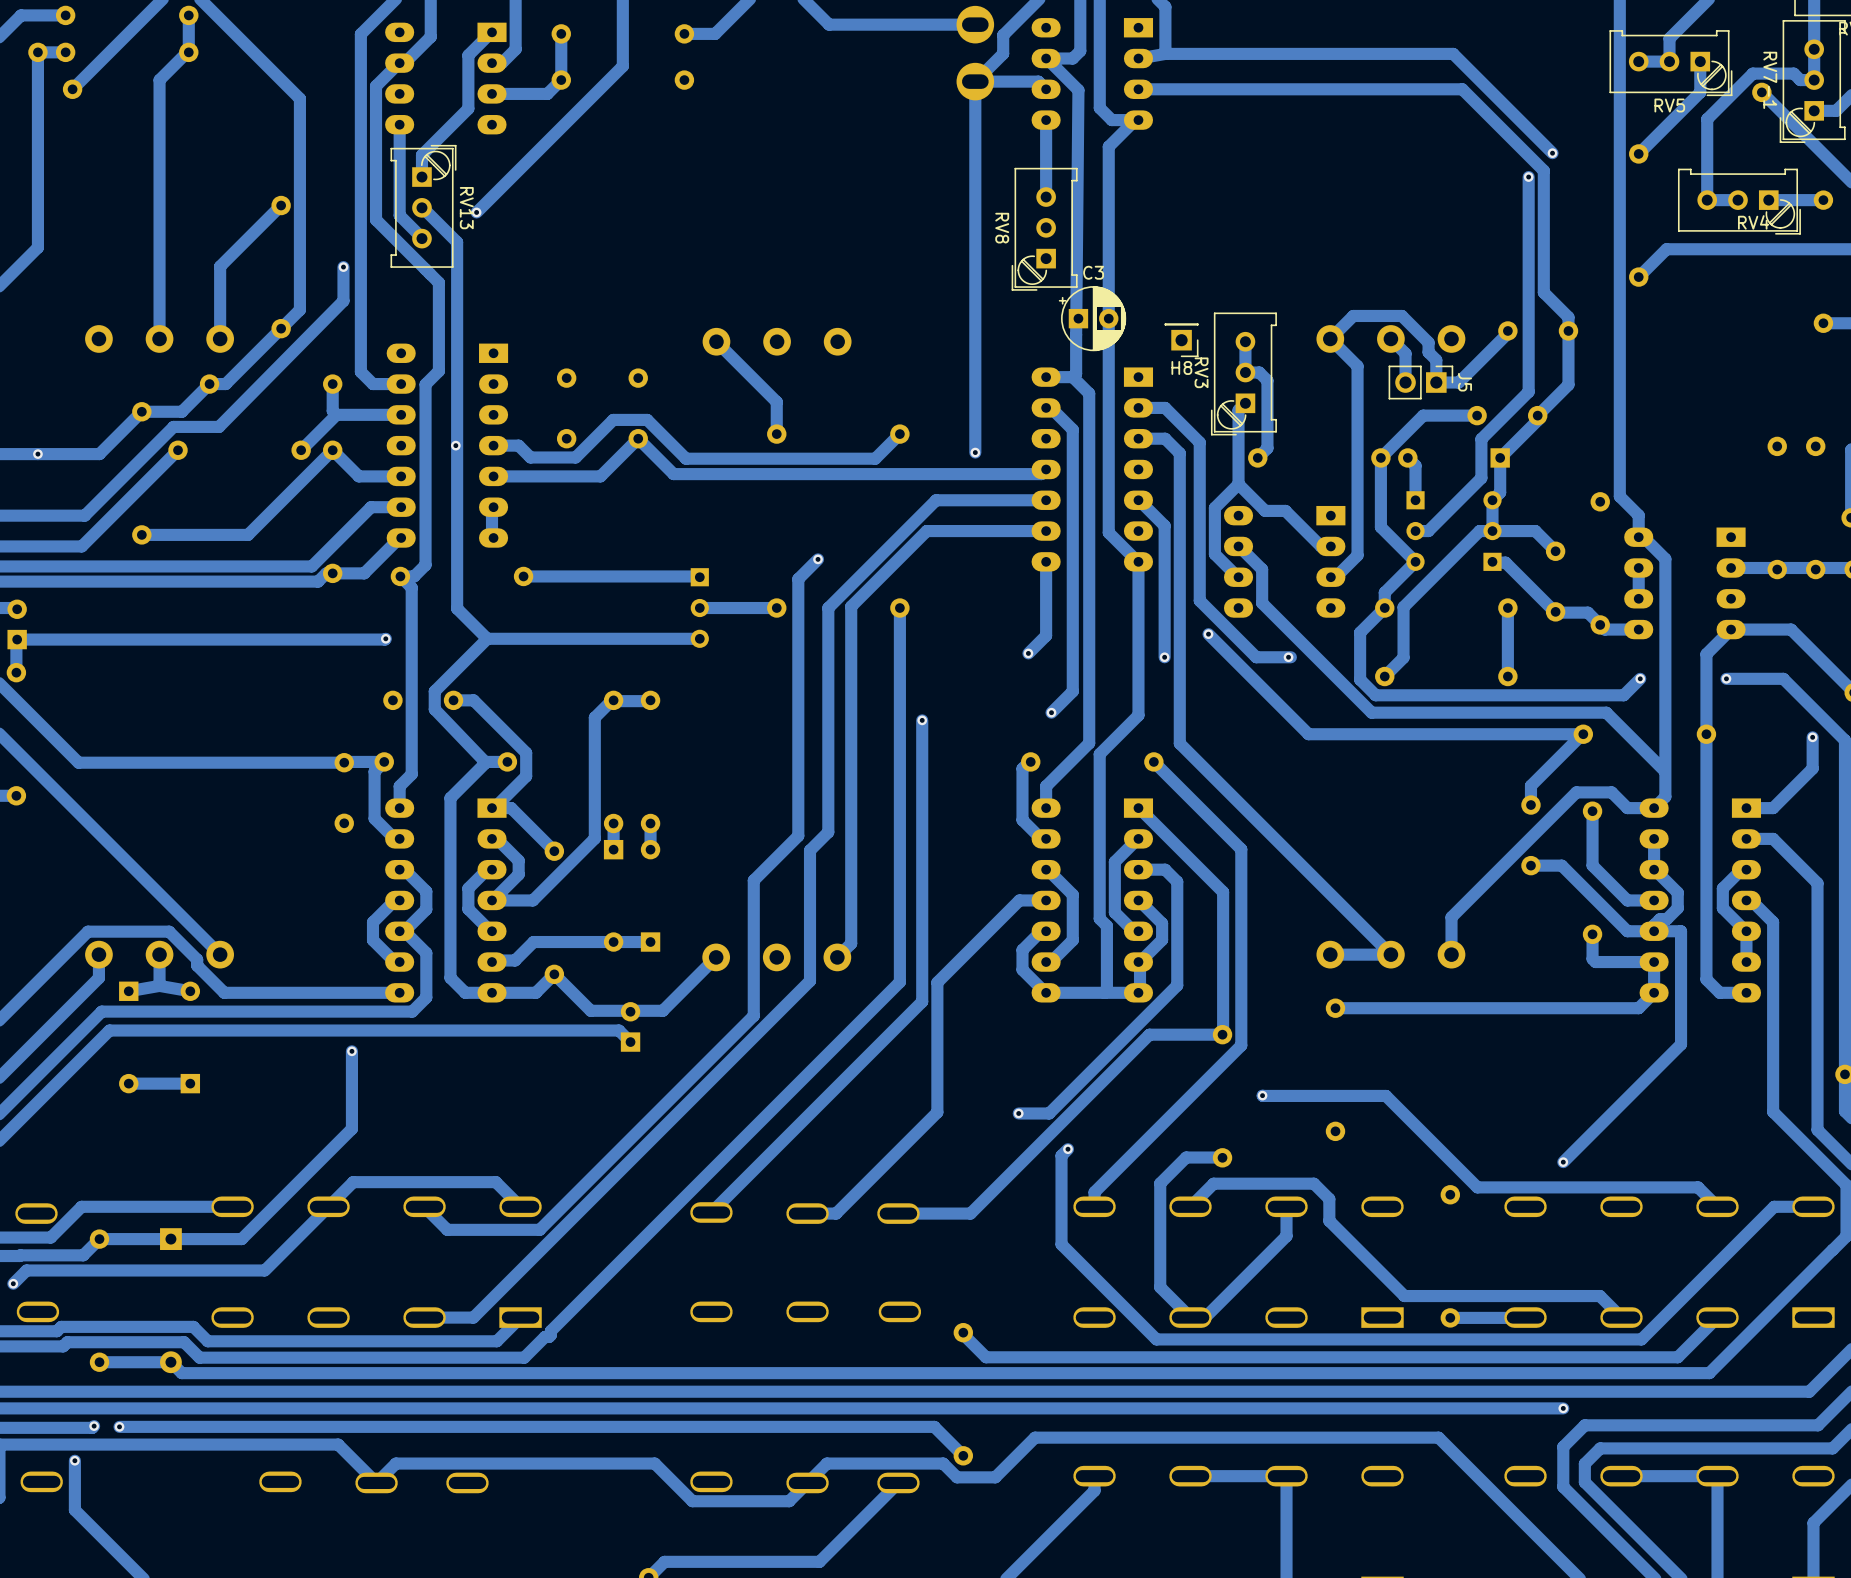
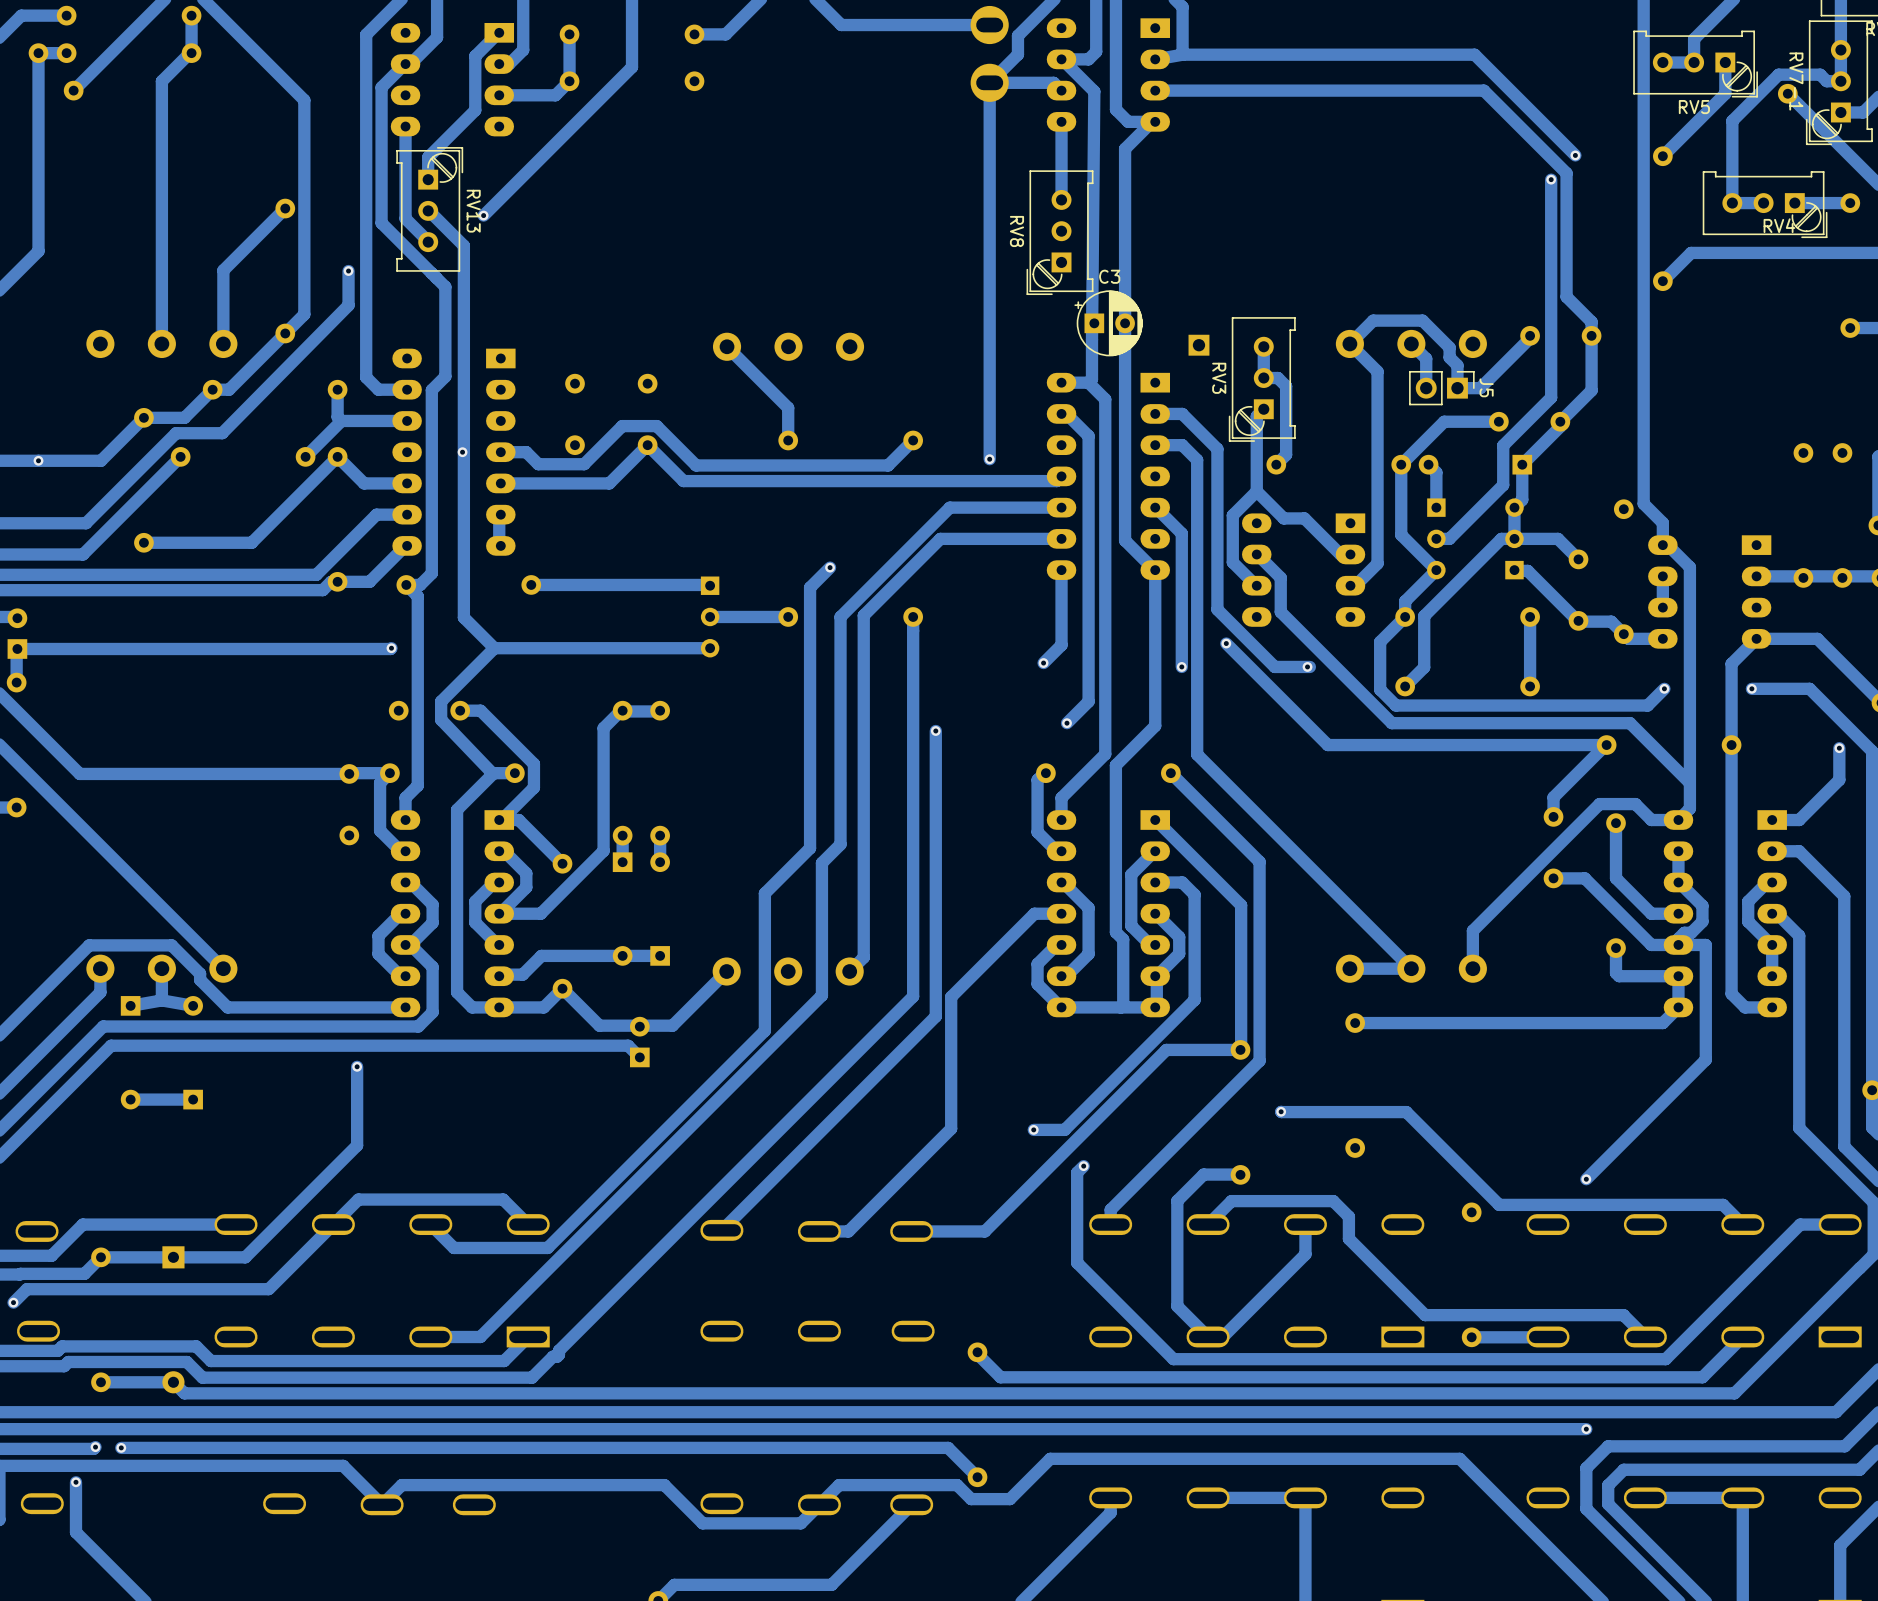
H8 side: bottom (1181, 340) -> top (1198, 345)

